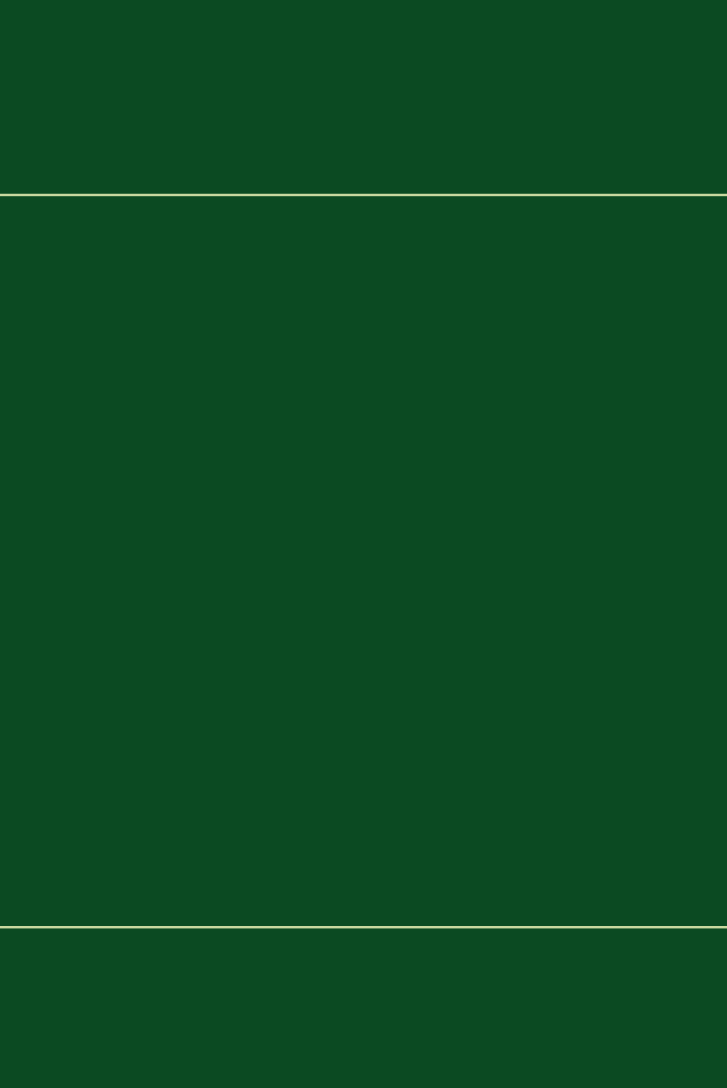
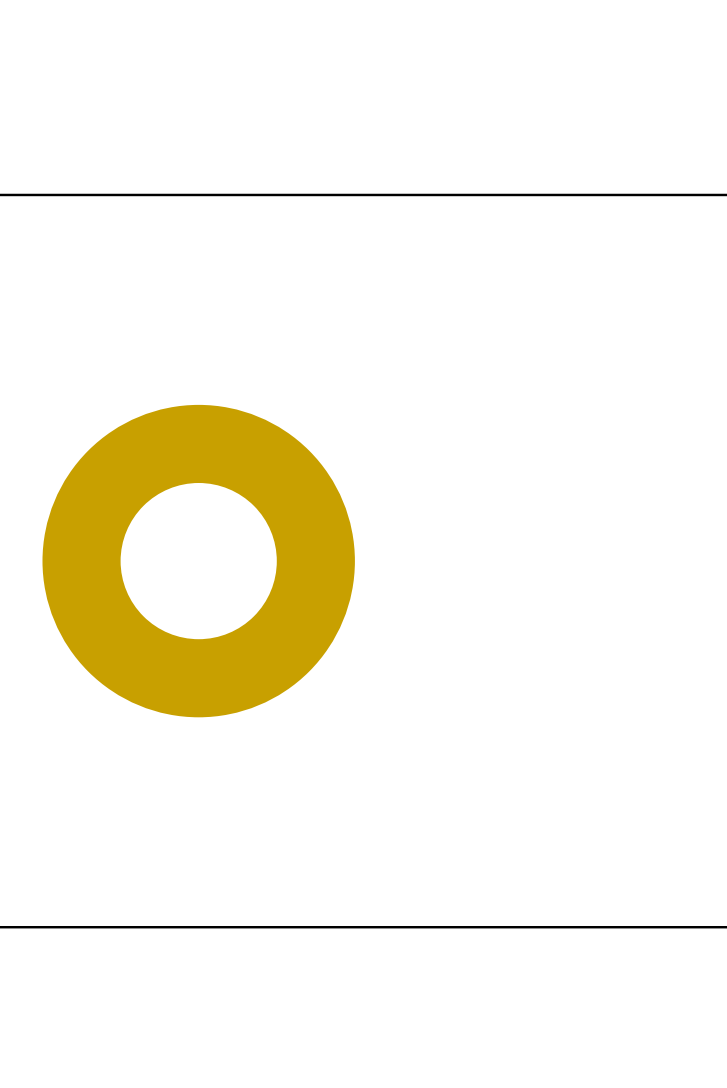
part: none -> (198, 561)

